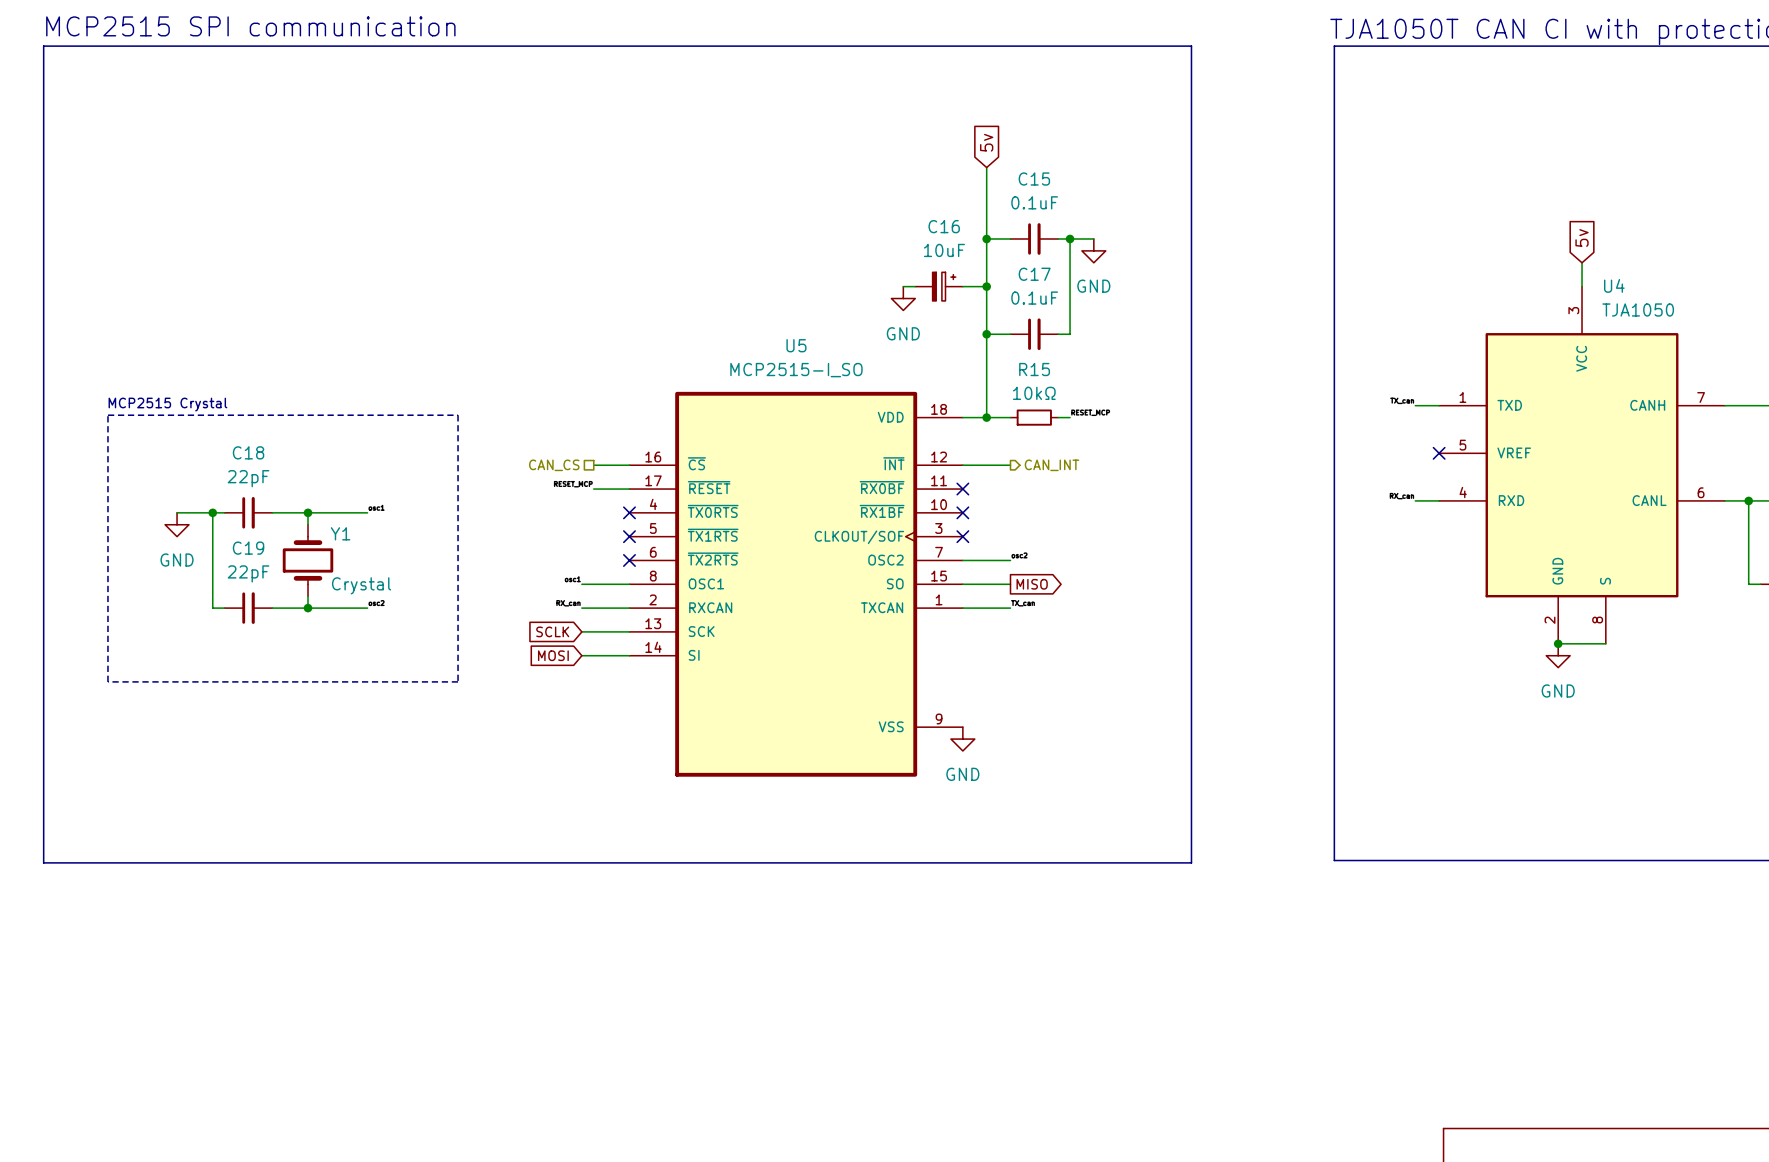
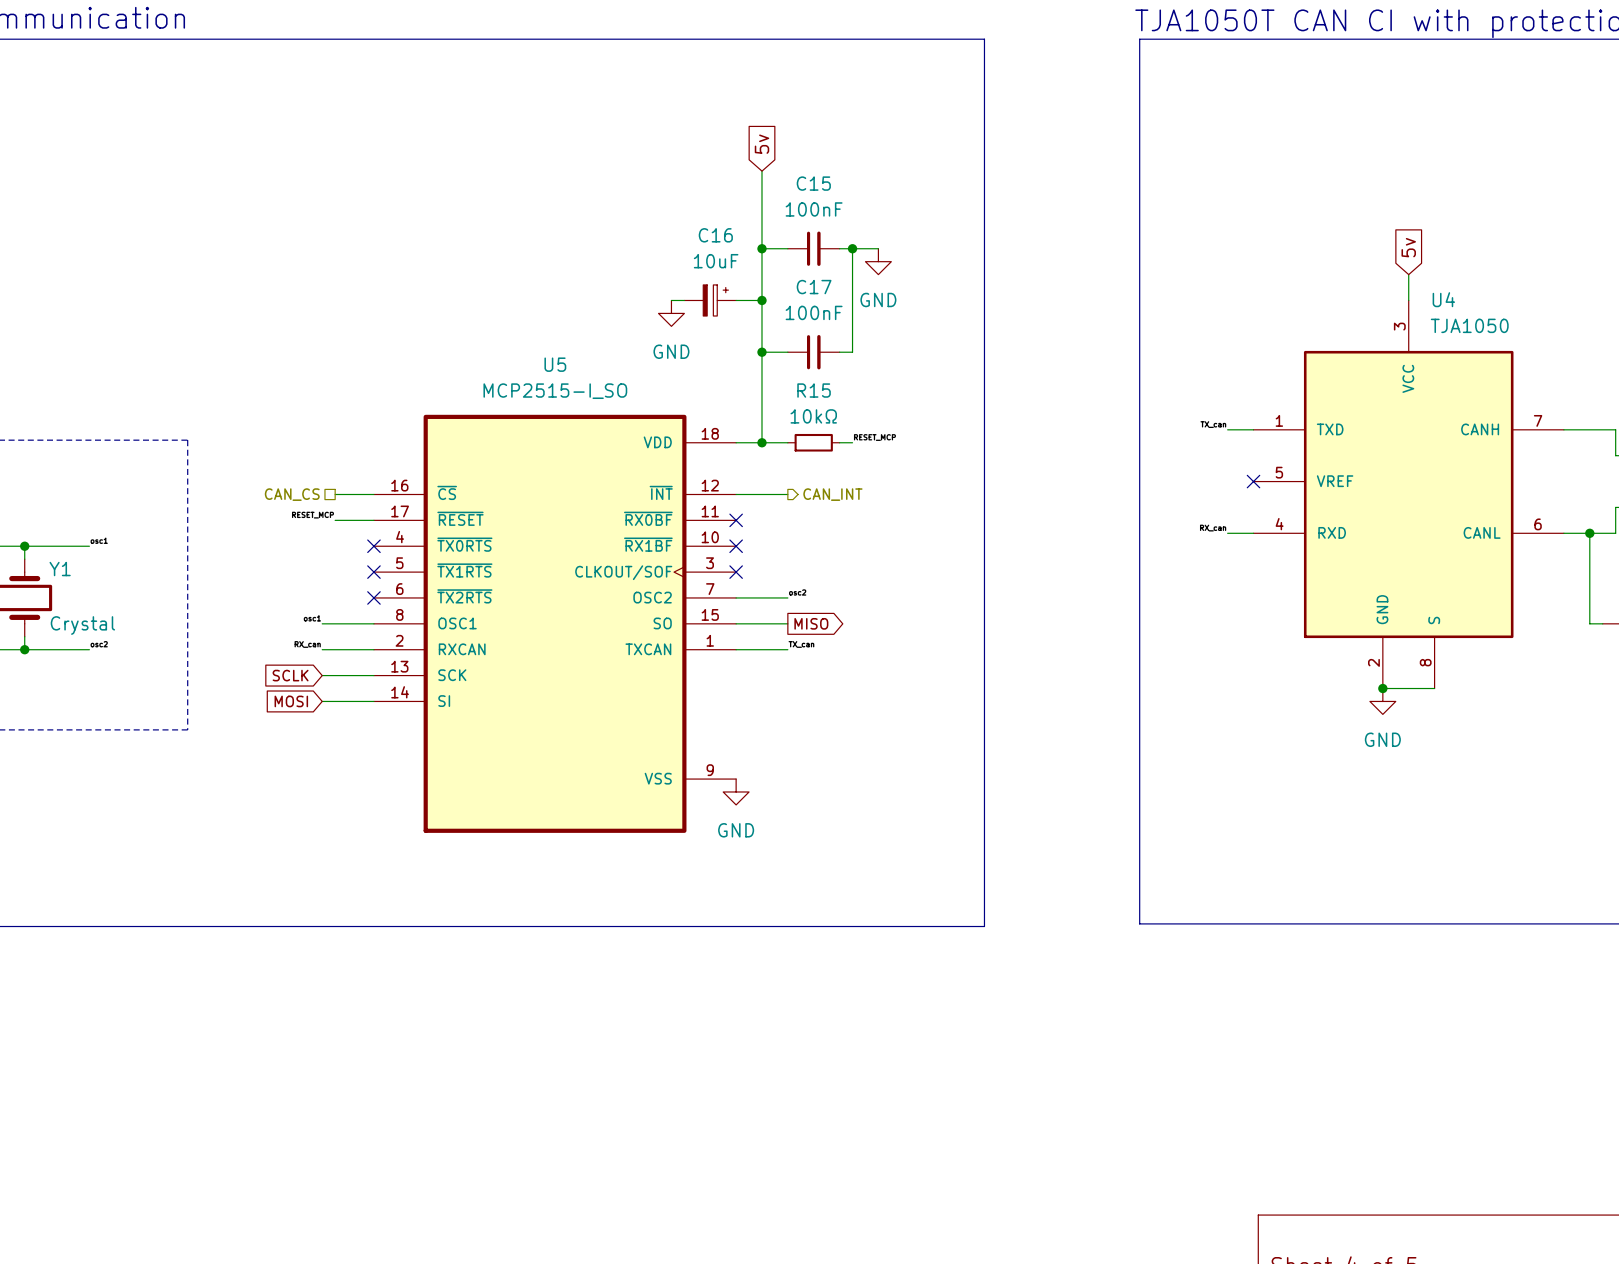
C15 value: 0.1uF (1034, 202) -> 100nF (814, 209)
C17 value: 0.1uF (1034, 298) -> 100nF (814, 312)

